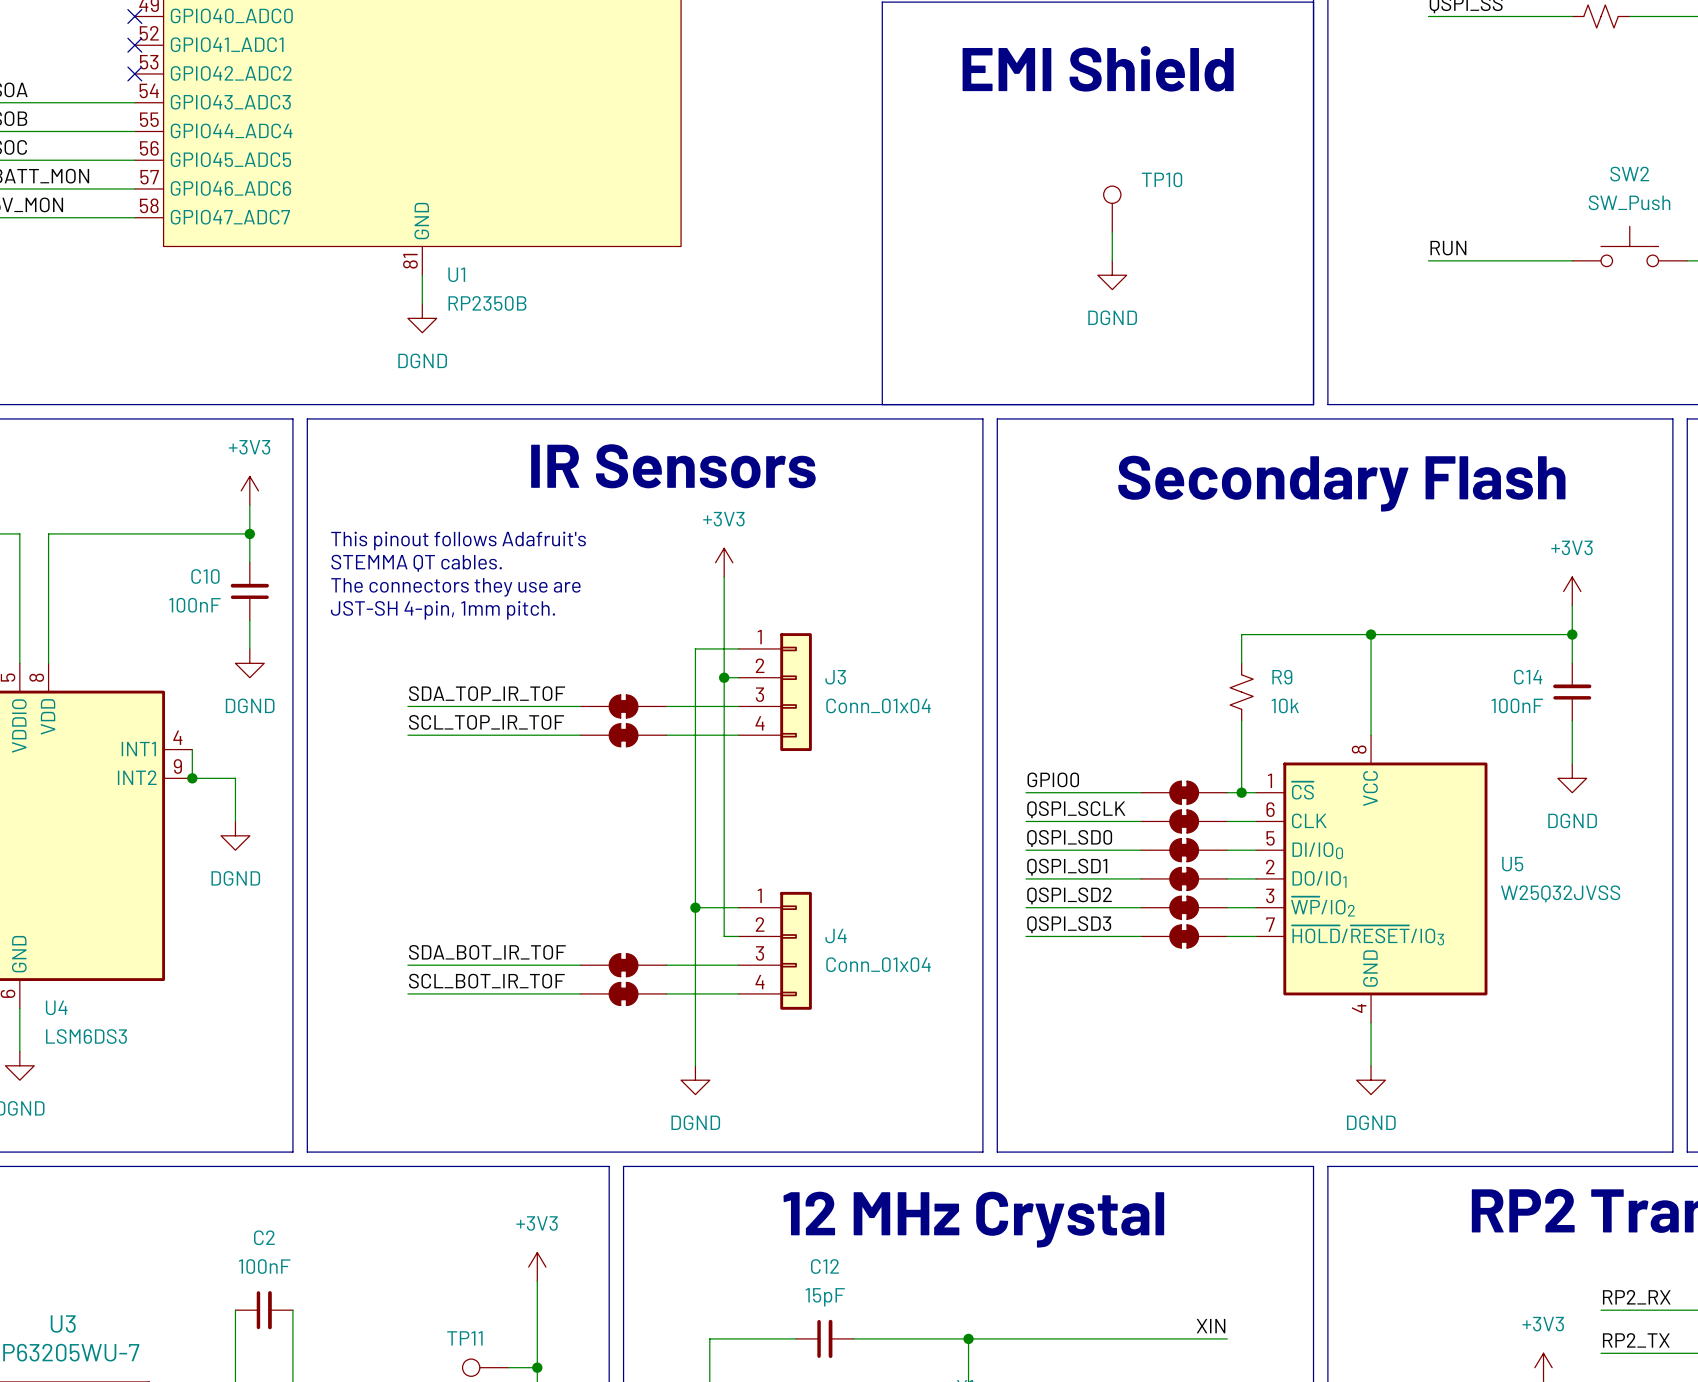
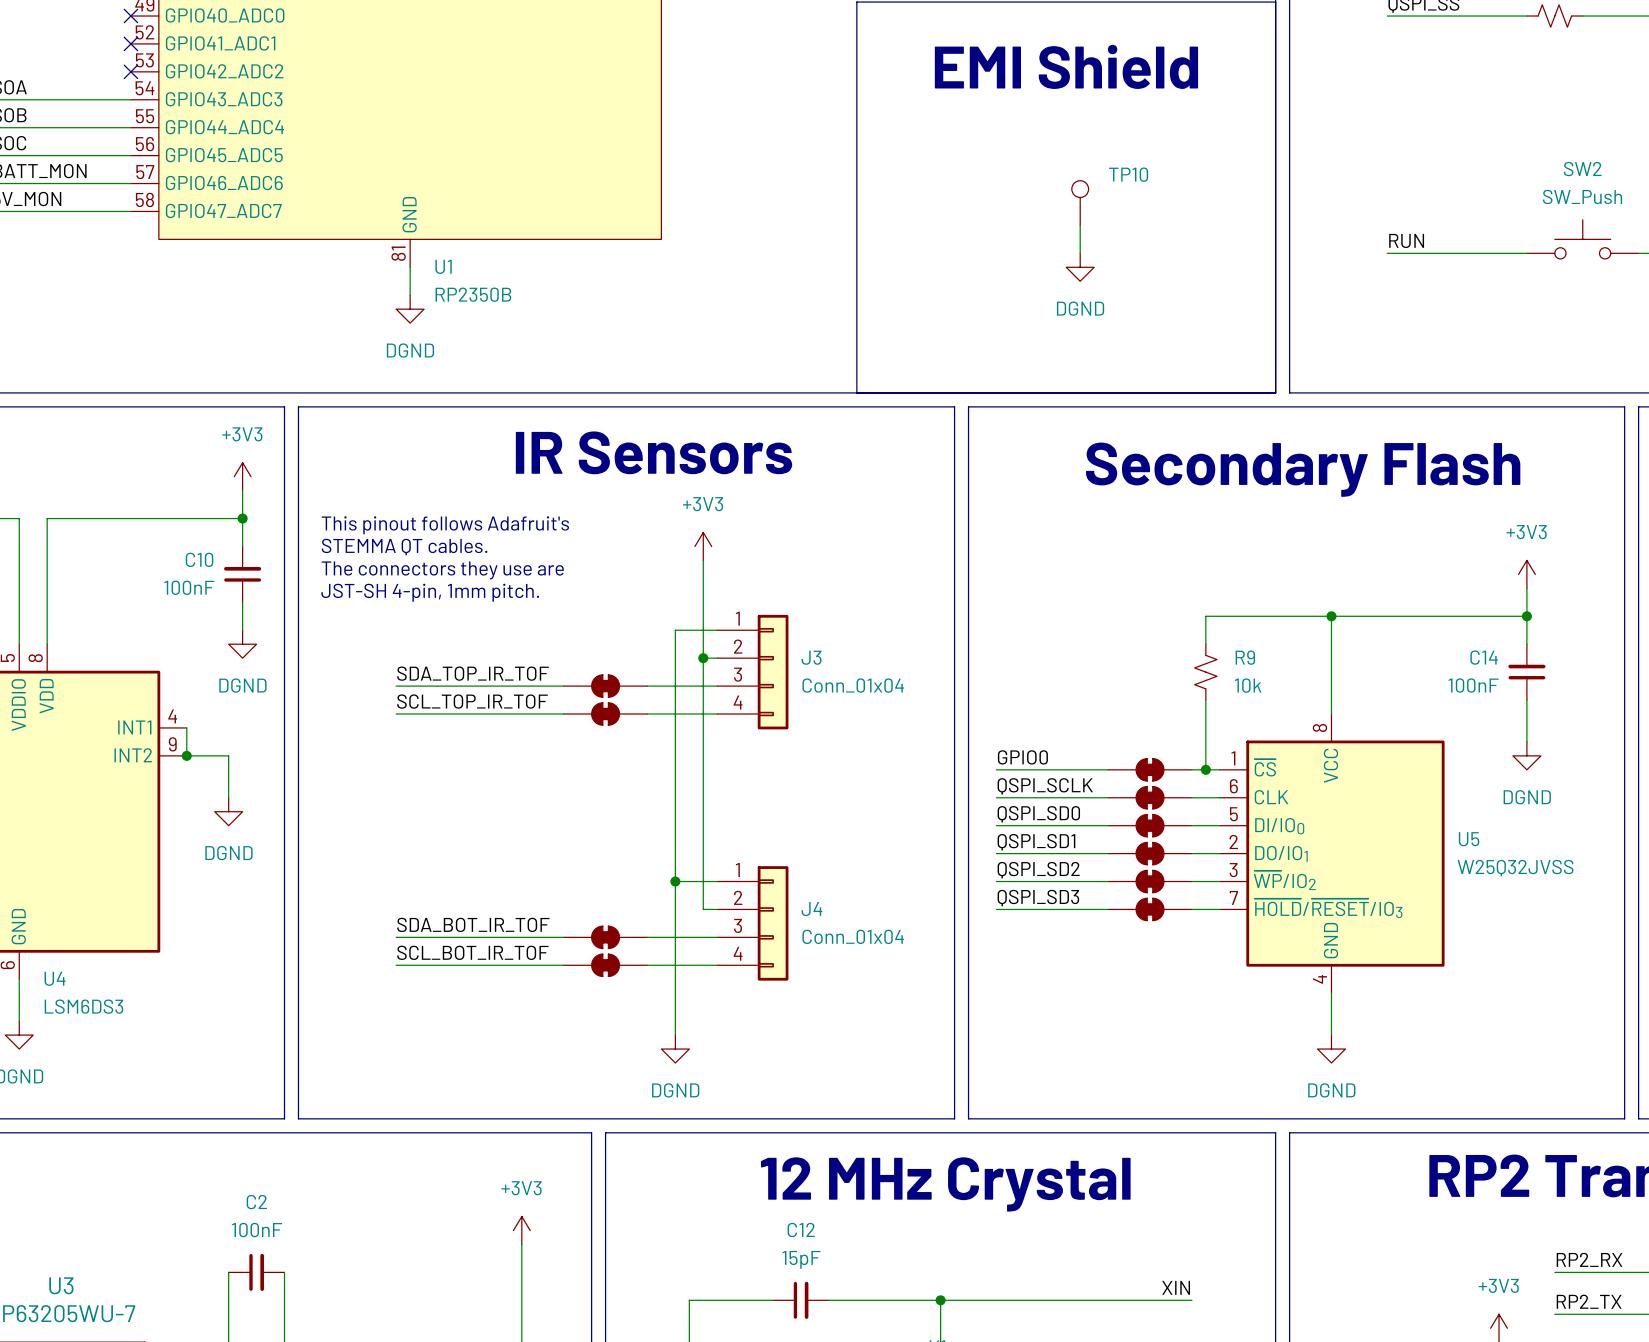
TP11: (485, 1367) -> none
wire: (508, 1367) (537, 1367) -> none
junction: (537, 1367) -> none

